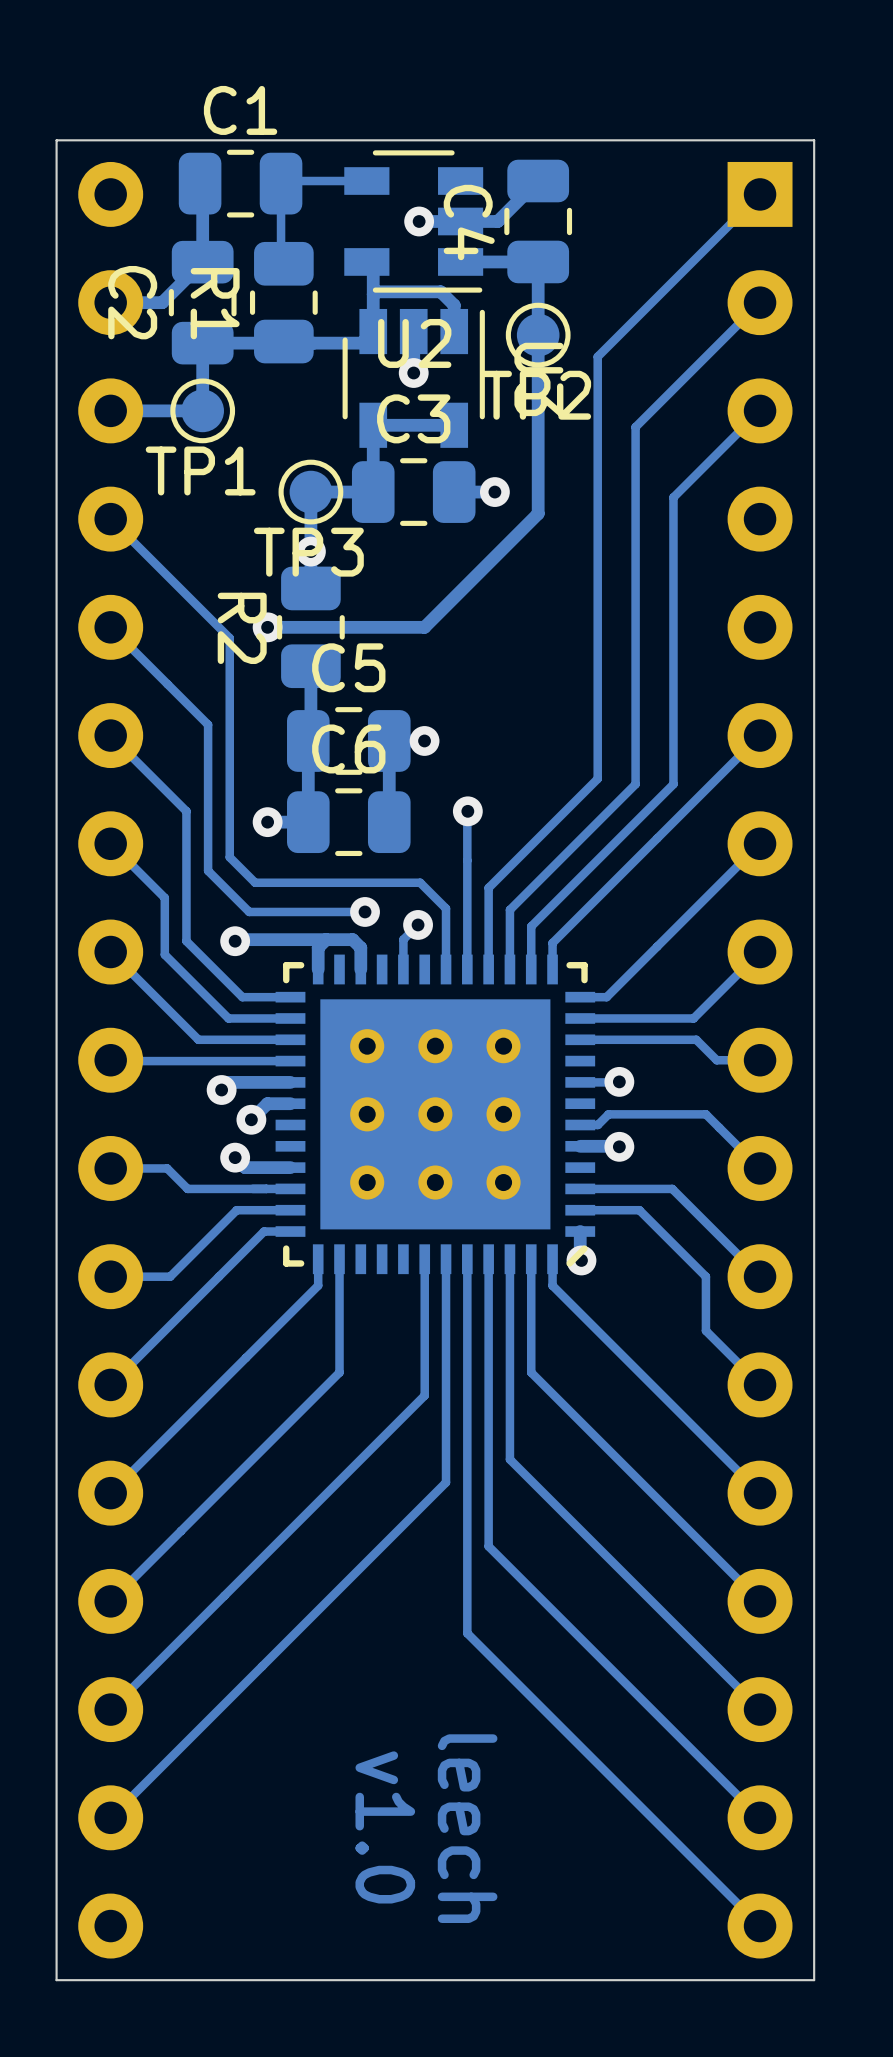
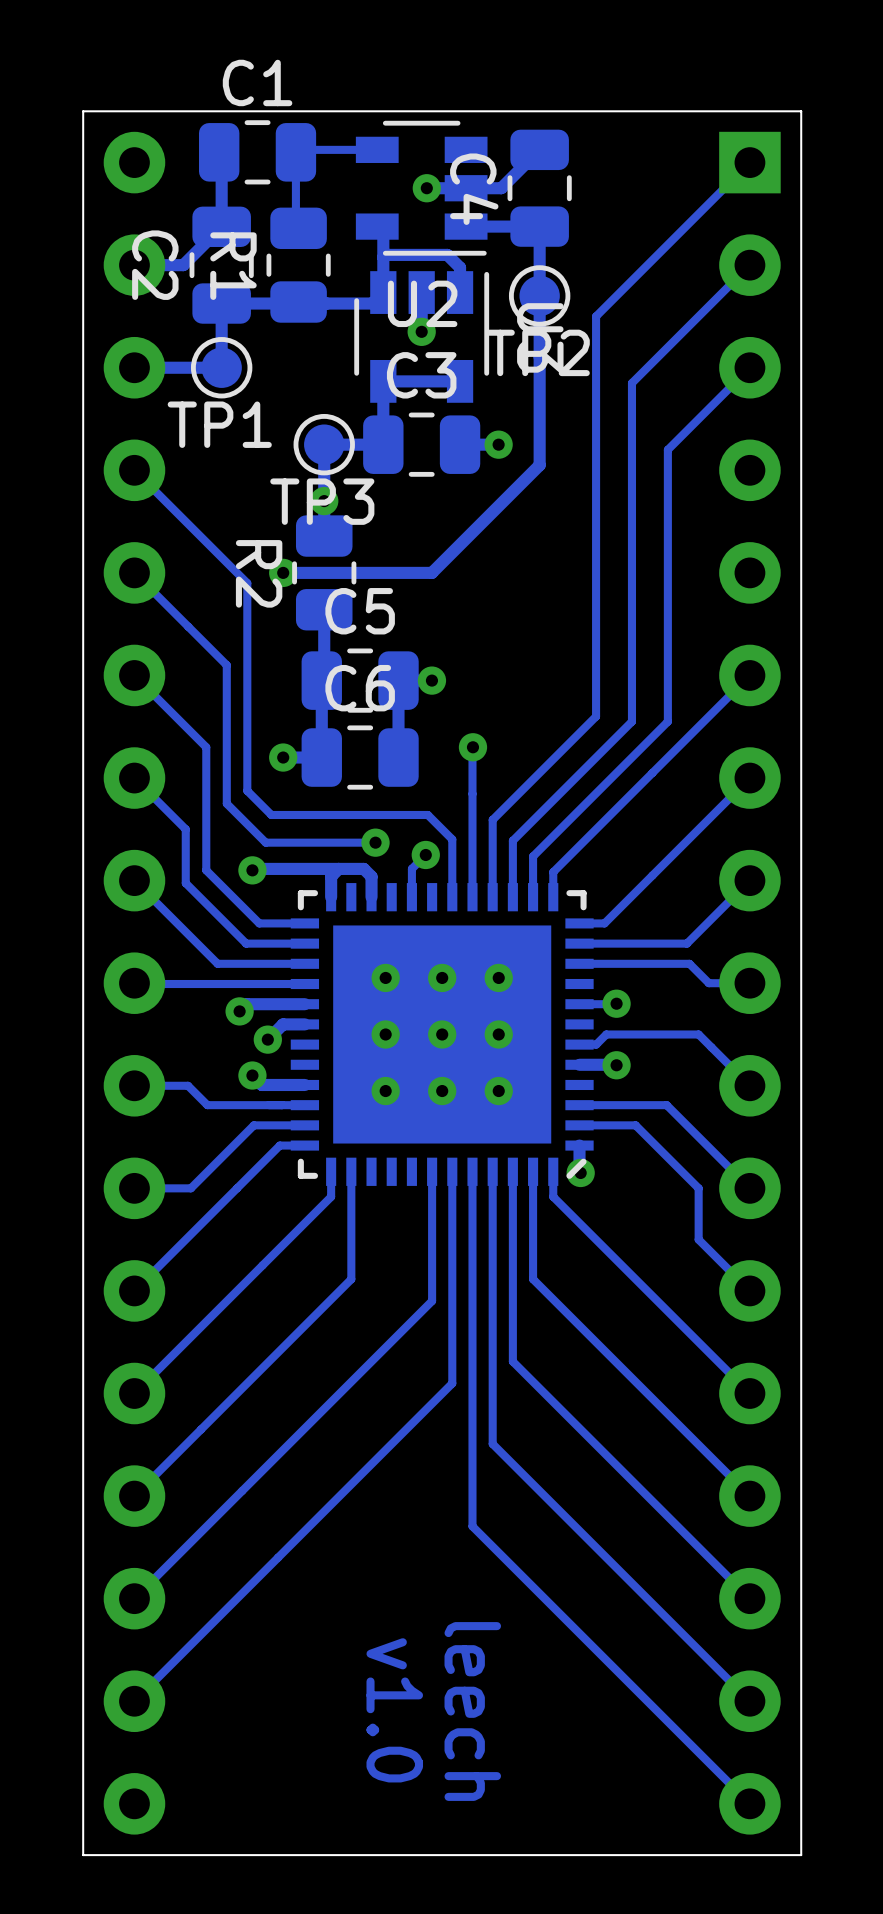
part footprint: [275, 954, 596, 1275] -> [290, 883, 594, 1186]

